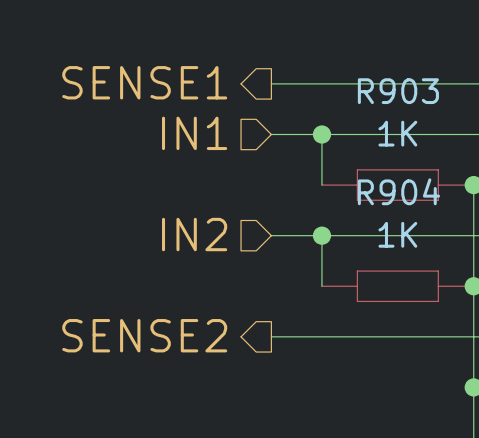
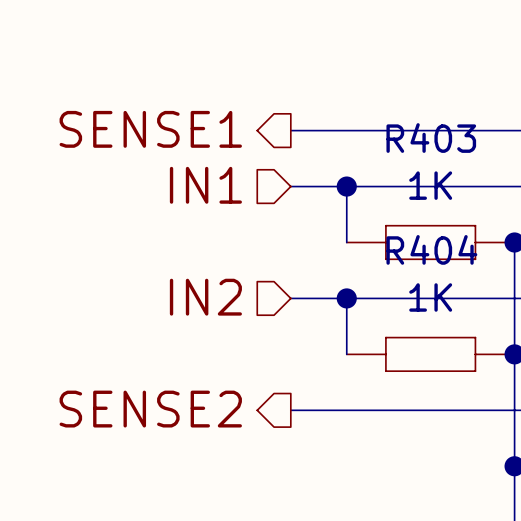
R903 name: R903 (398, 91) -> R403 (431, 138)
R904 name: R904 (398, 191) -> R404 (431, 249)

